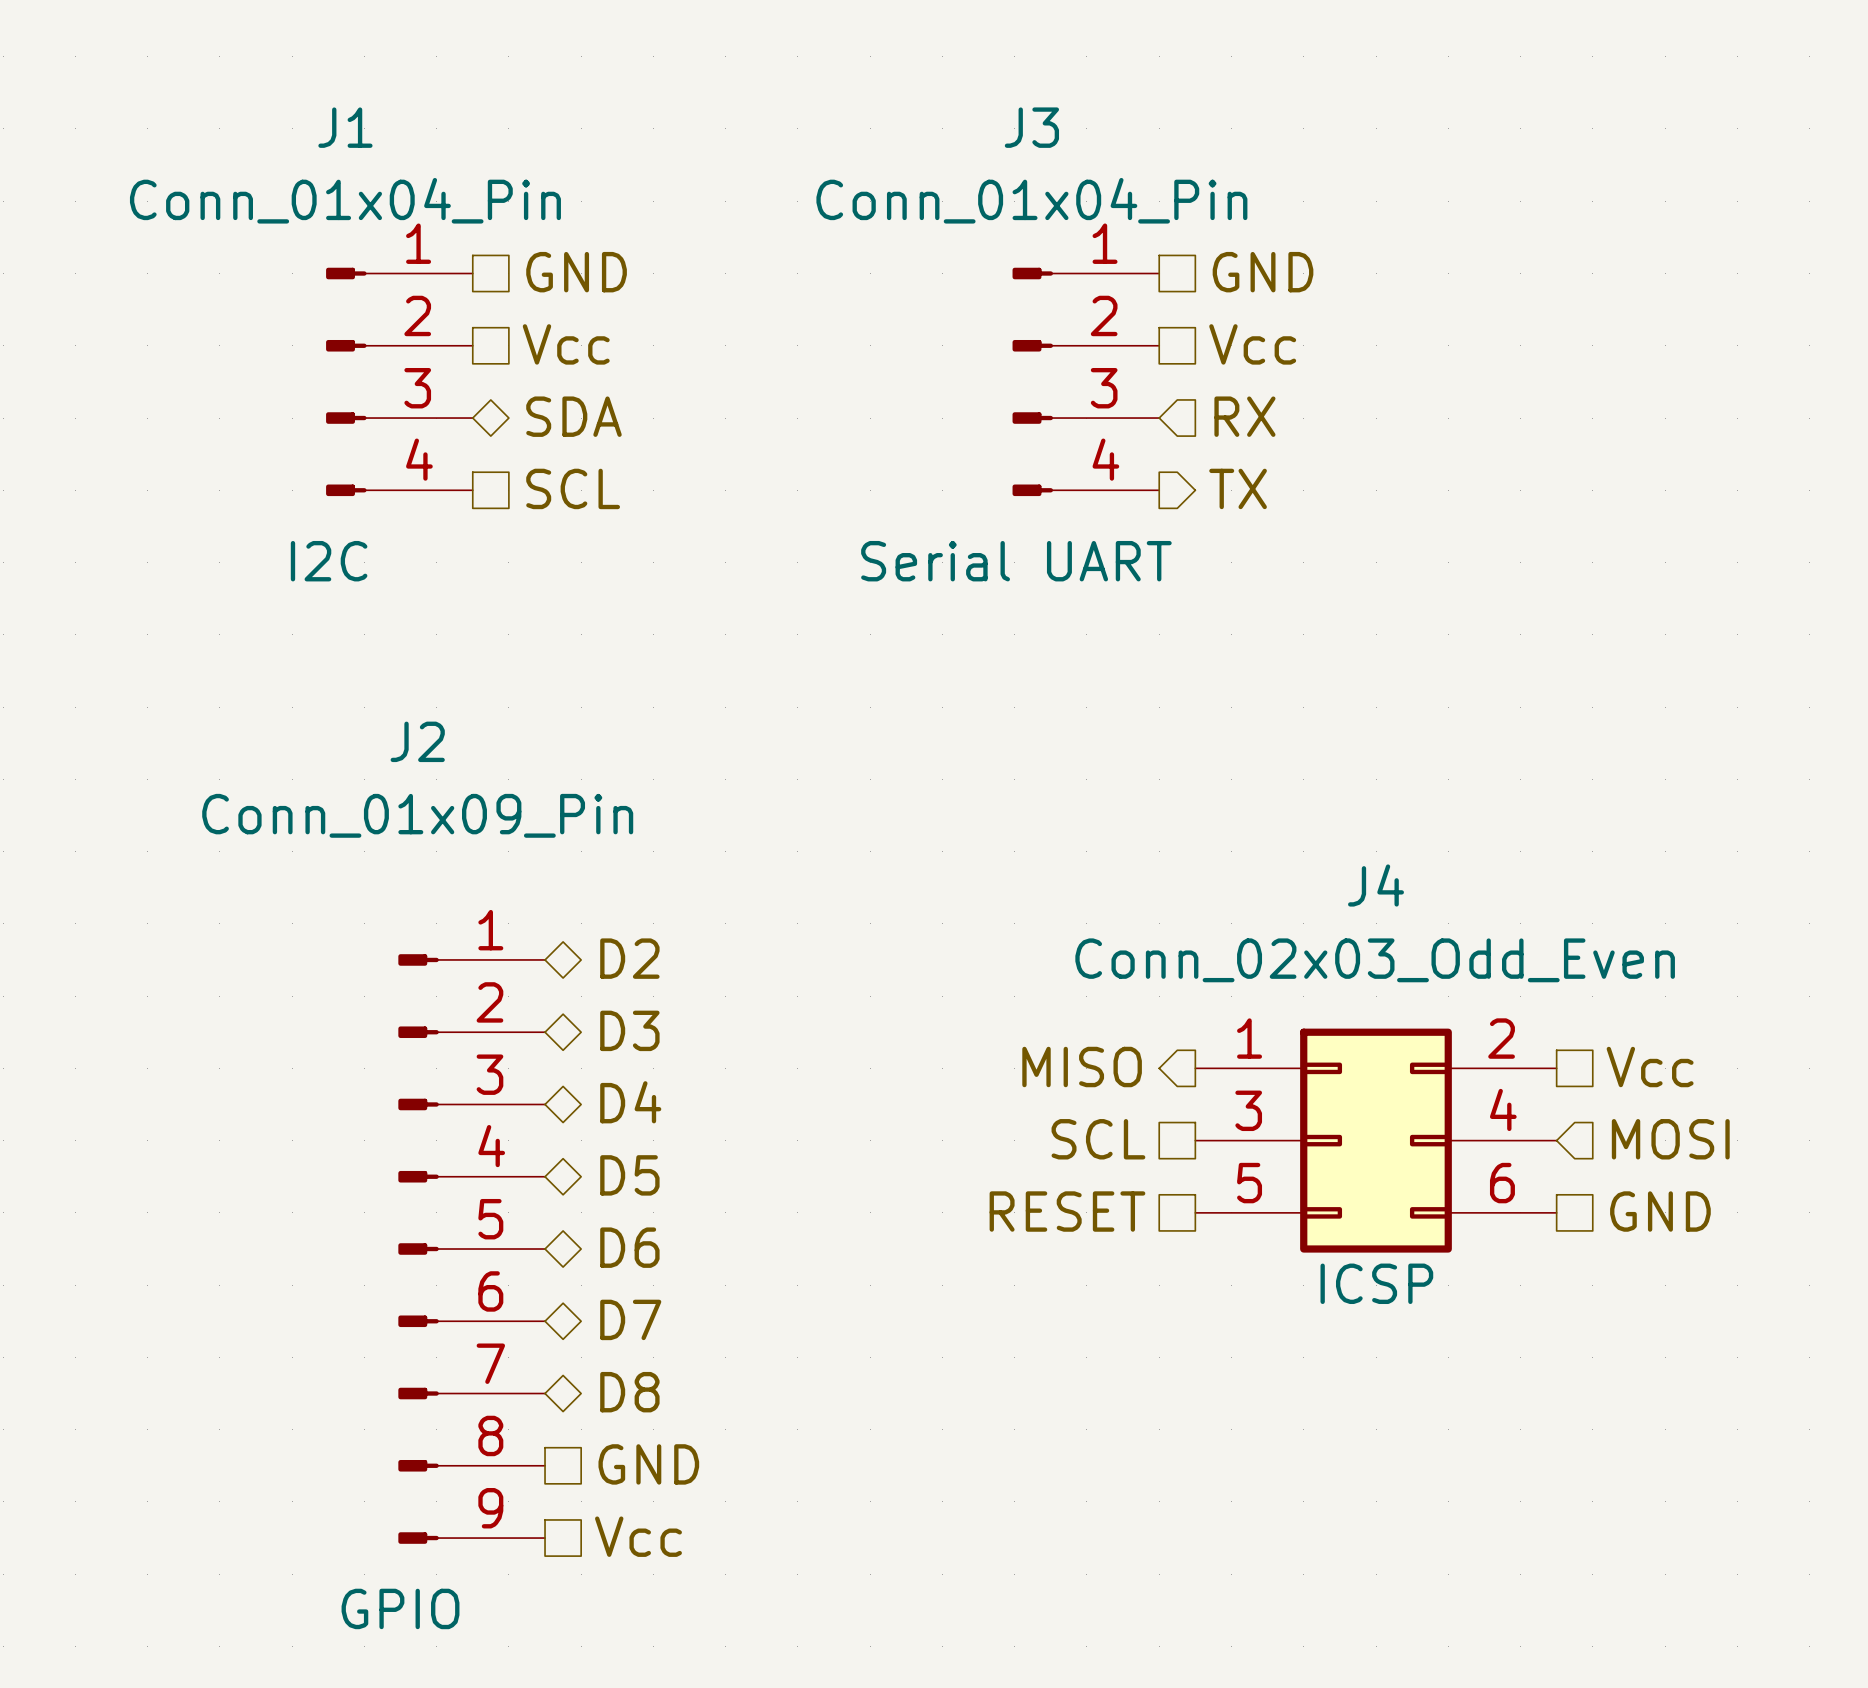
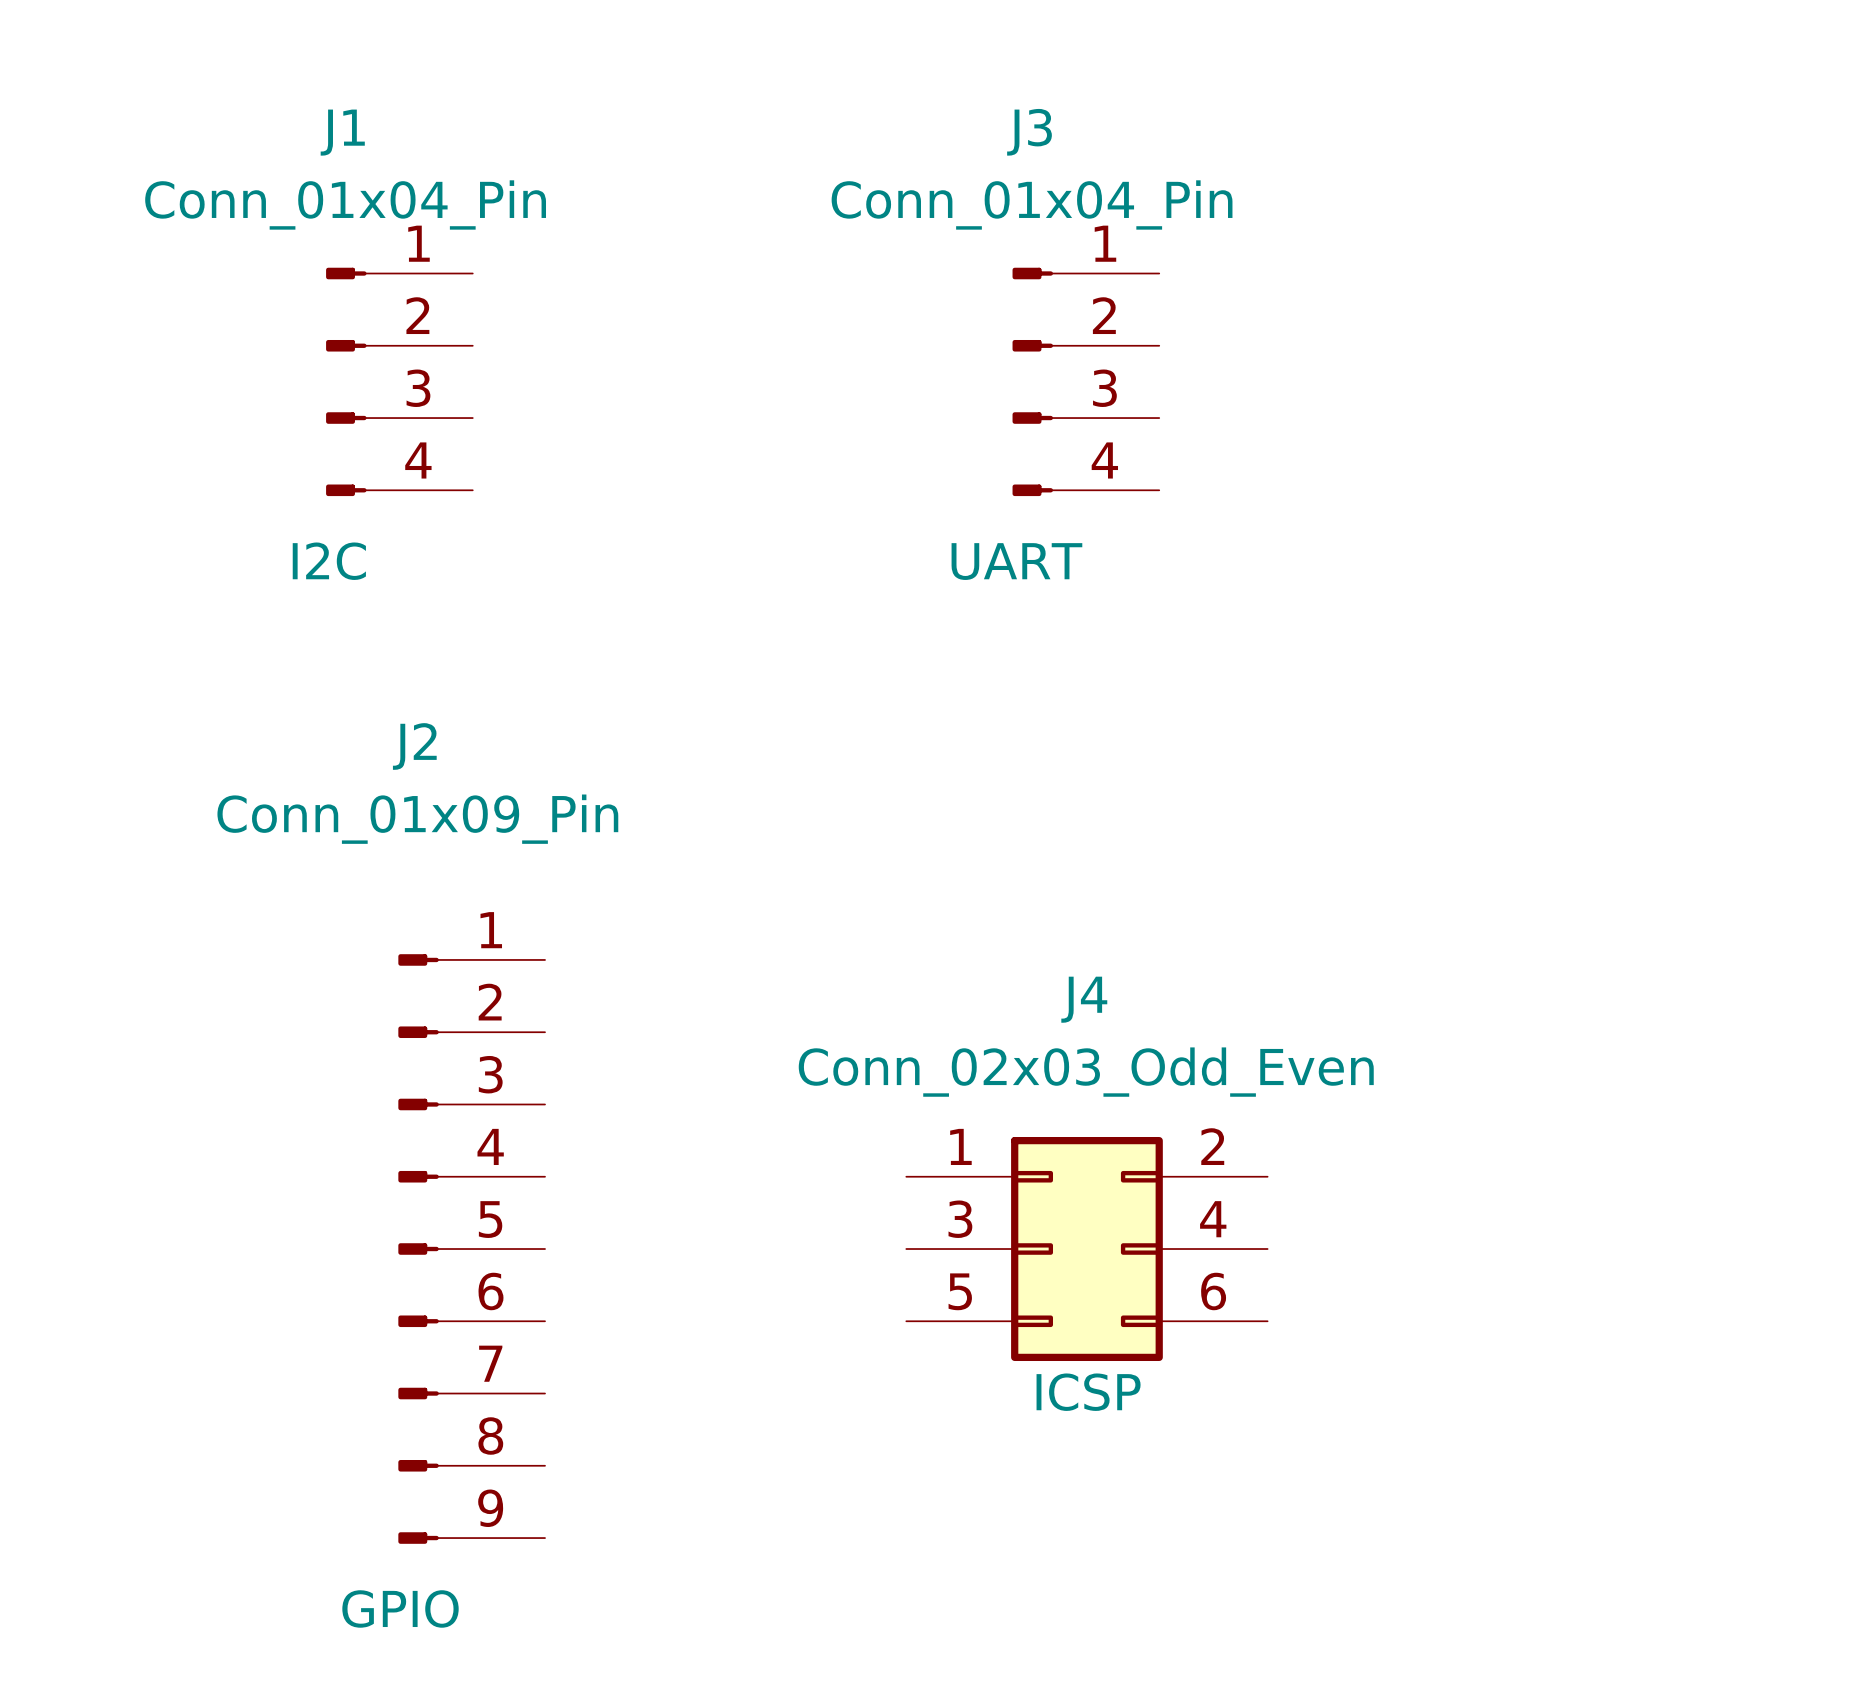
hierarchical label: GND (576, 272) -> none
hierarchical label: GND (1263, 272) -> none
hierarchical label: Vcc (566, 344) -> none
hierarchical label: Vcc (1252, 344) -> none
hierarchical label: SDA (573, 416) -> none
hierarchical label: RX (1244, 416) -> none
hierarchical label: SCL (573, 488) -> none
hierarchical label: TX (1238, 488) -> none
J3 text: Serial UART (1016, 561) -> UART (1016, 561)
hierarchical label: D2 (629, 958) -> none
hierarchical label: D3 (629, 1030) -> none
hierarchical label: MISO (1082, 1067) -> none
hierarchical label: Vcc (1650, 1067) -> none
hierarchical label: D4 (630, 1102) -> none
hierarchical label: SCL (1098, 1139) -> none
hierarchical label: MOSI (1670, 1139) -> none
J4 position: (1376, 1140) -> (1086, 1249)
hierarchical label: D5 (629, 1175) -> none
hierarchical label: RESET (1067, 1211) -> none
hierarchical label: GND (1660, 1211) -> none
hierarchical label: D6 (629, 1247) -> none
hierarchical label: D7 (630, 1319) -> none
hierarchical label: D8 (629, 1392) -> none
hierarchical label: GND (648, 1464) -> none
hierarchical label: Vcc (638, 1536) -> none

